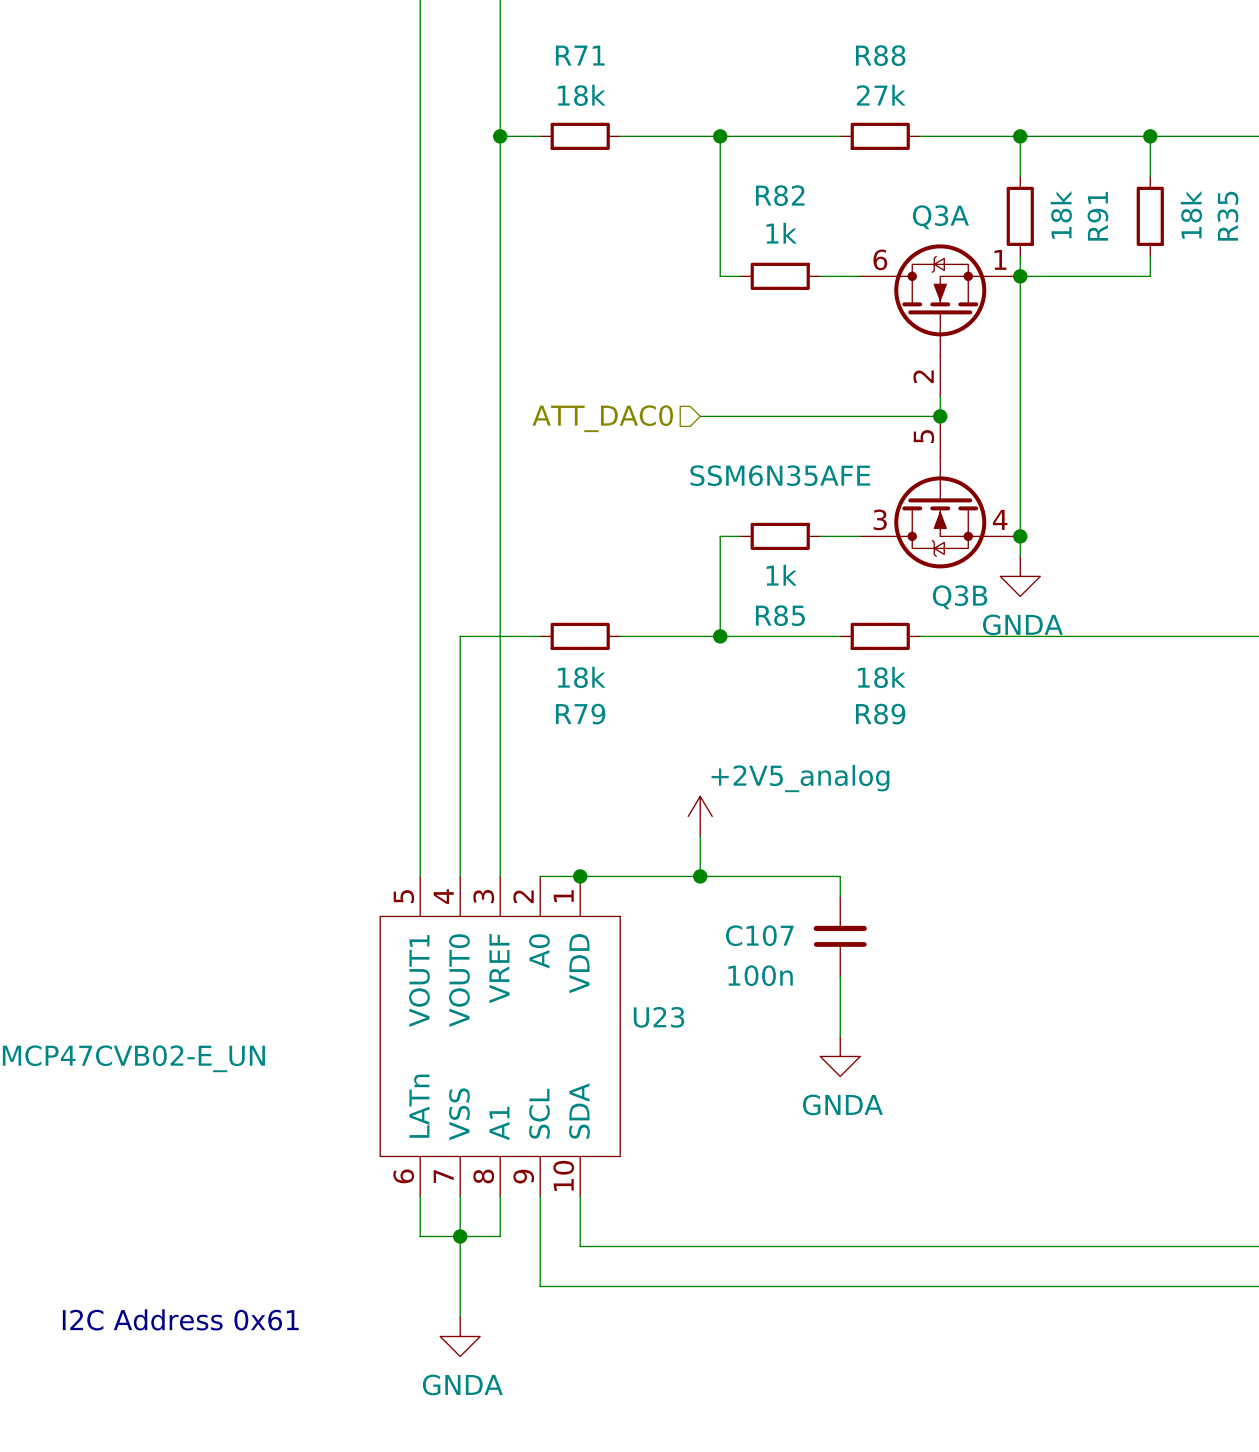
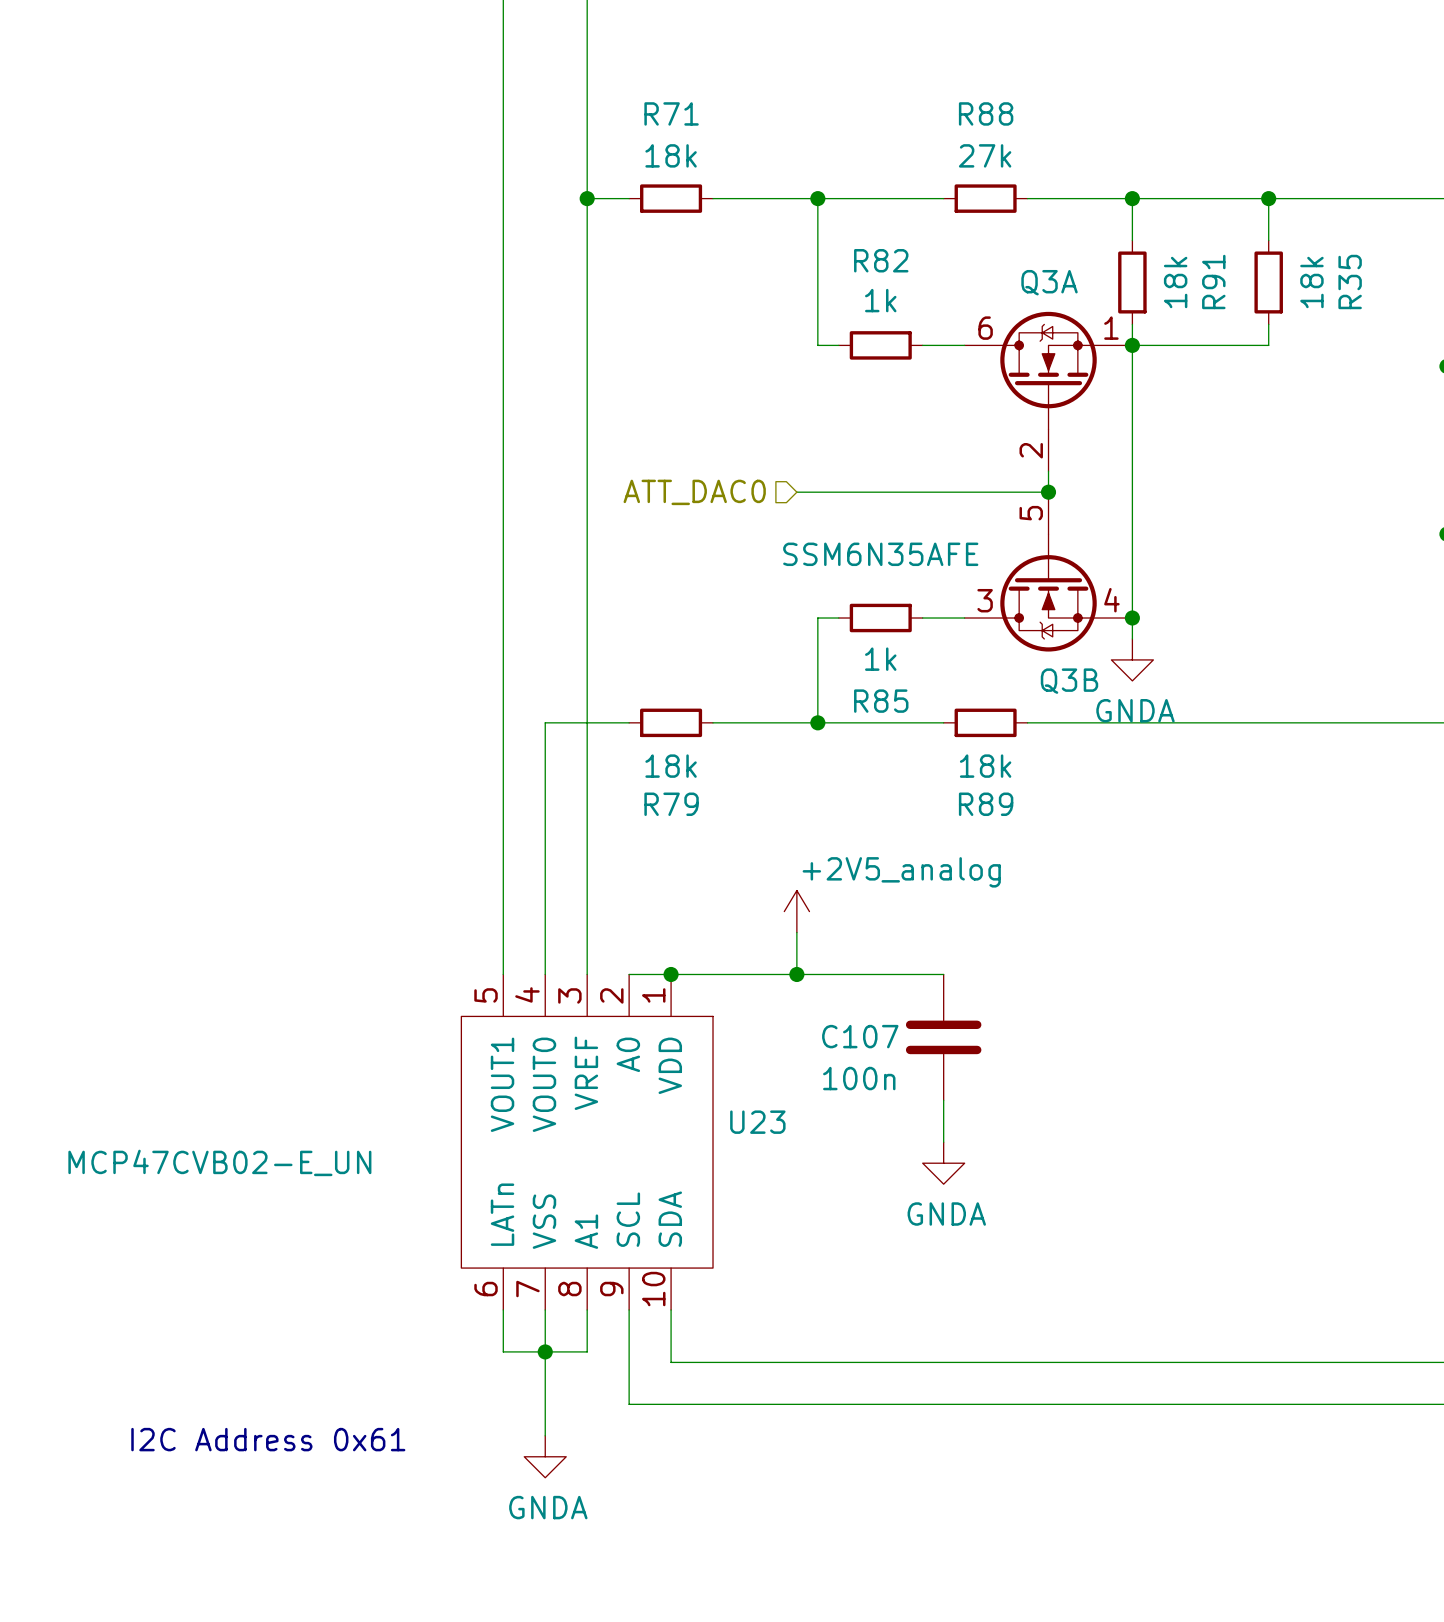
C107 symbol: [813, 896, 867, 977] -> [905, 974, 982, 1101]

